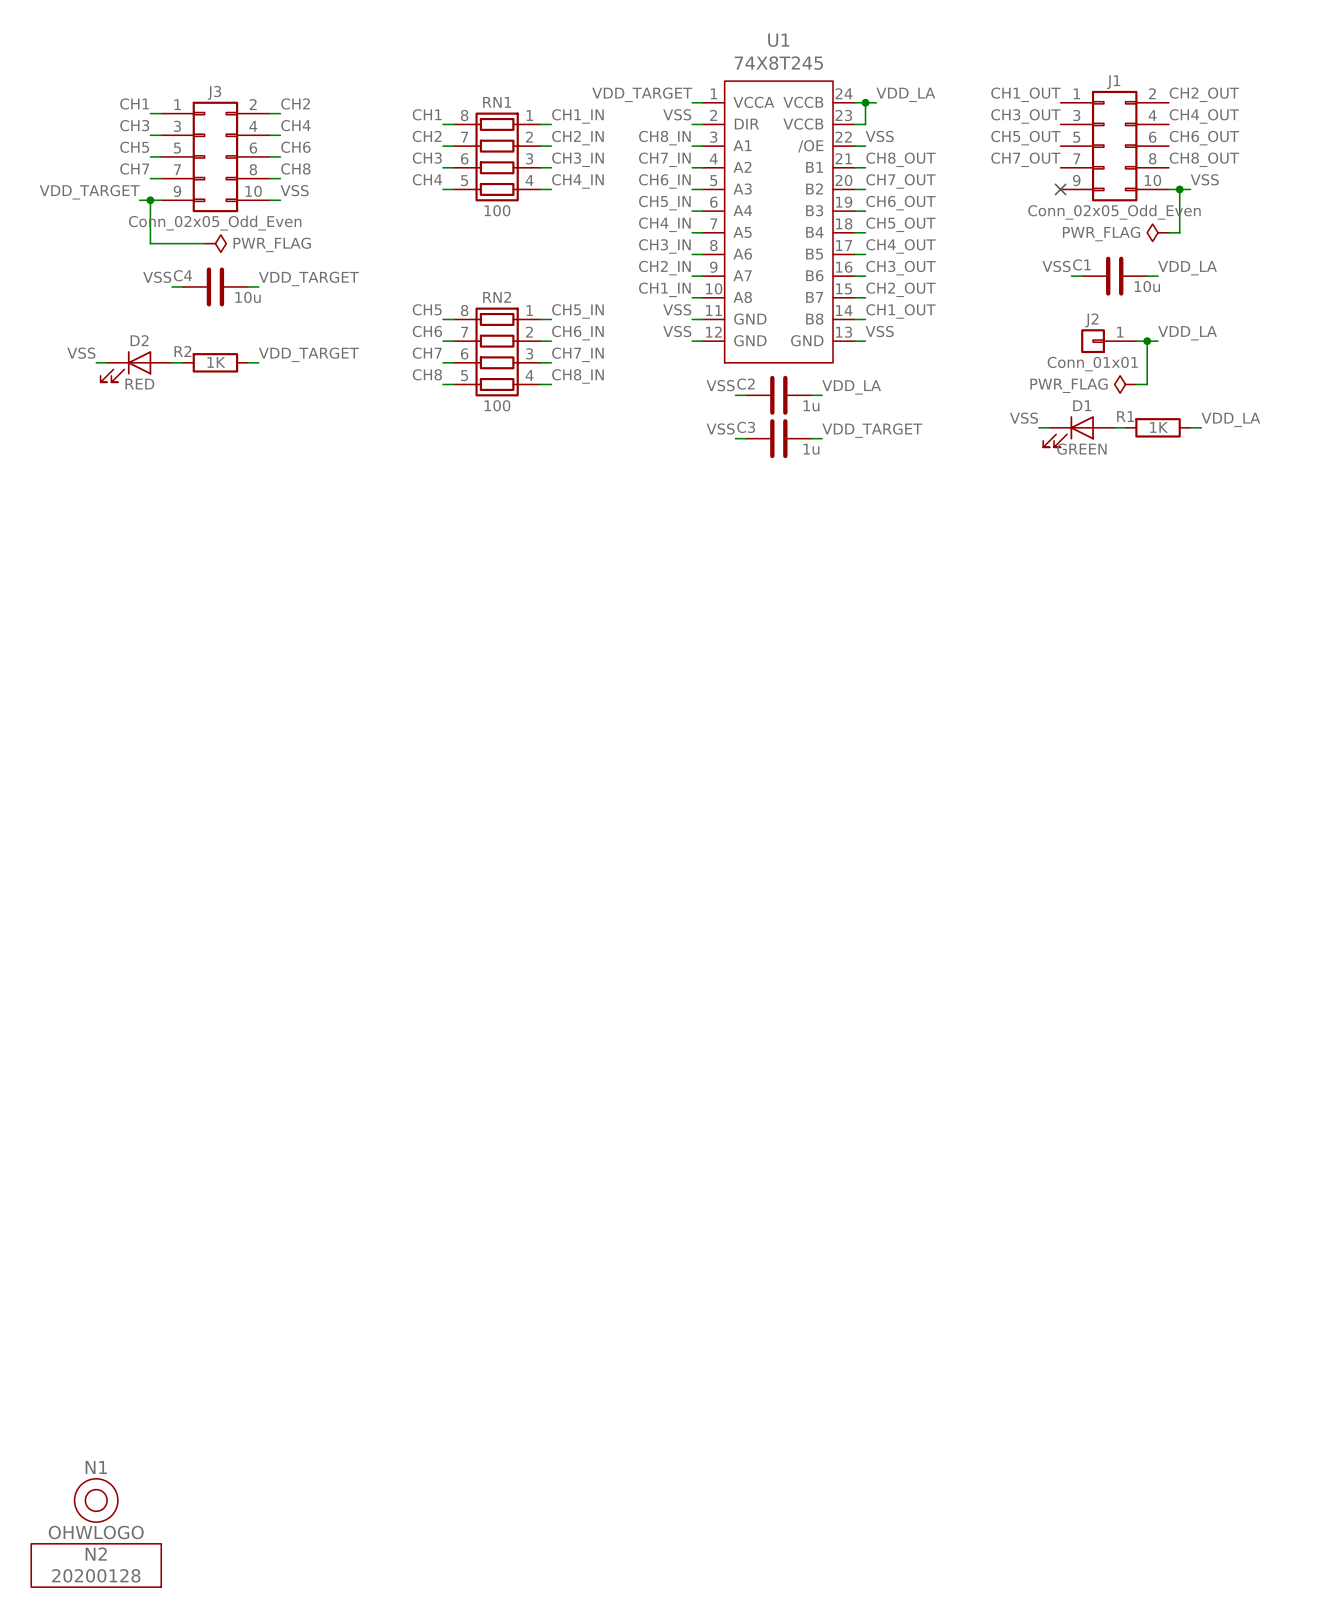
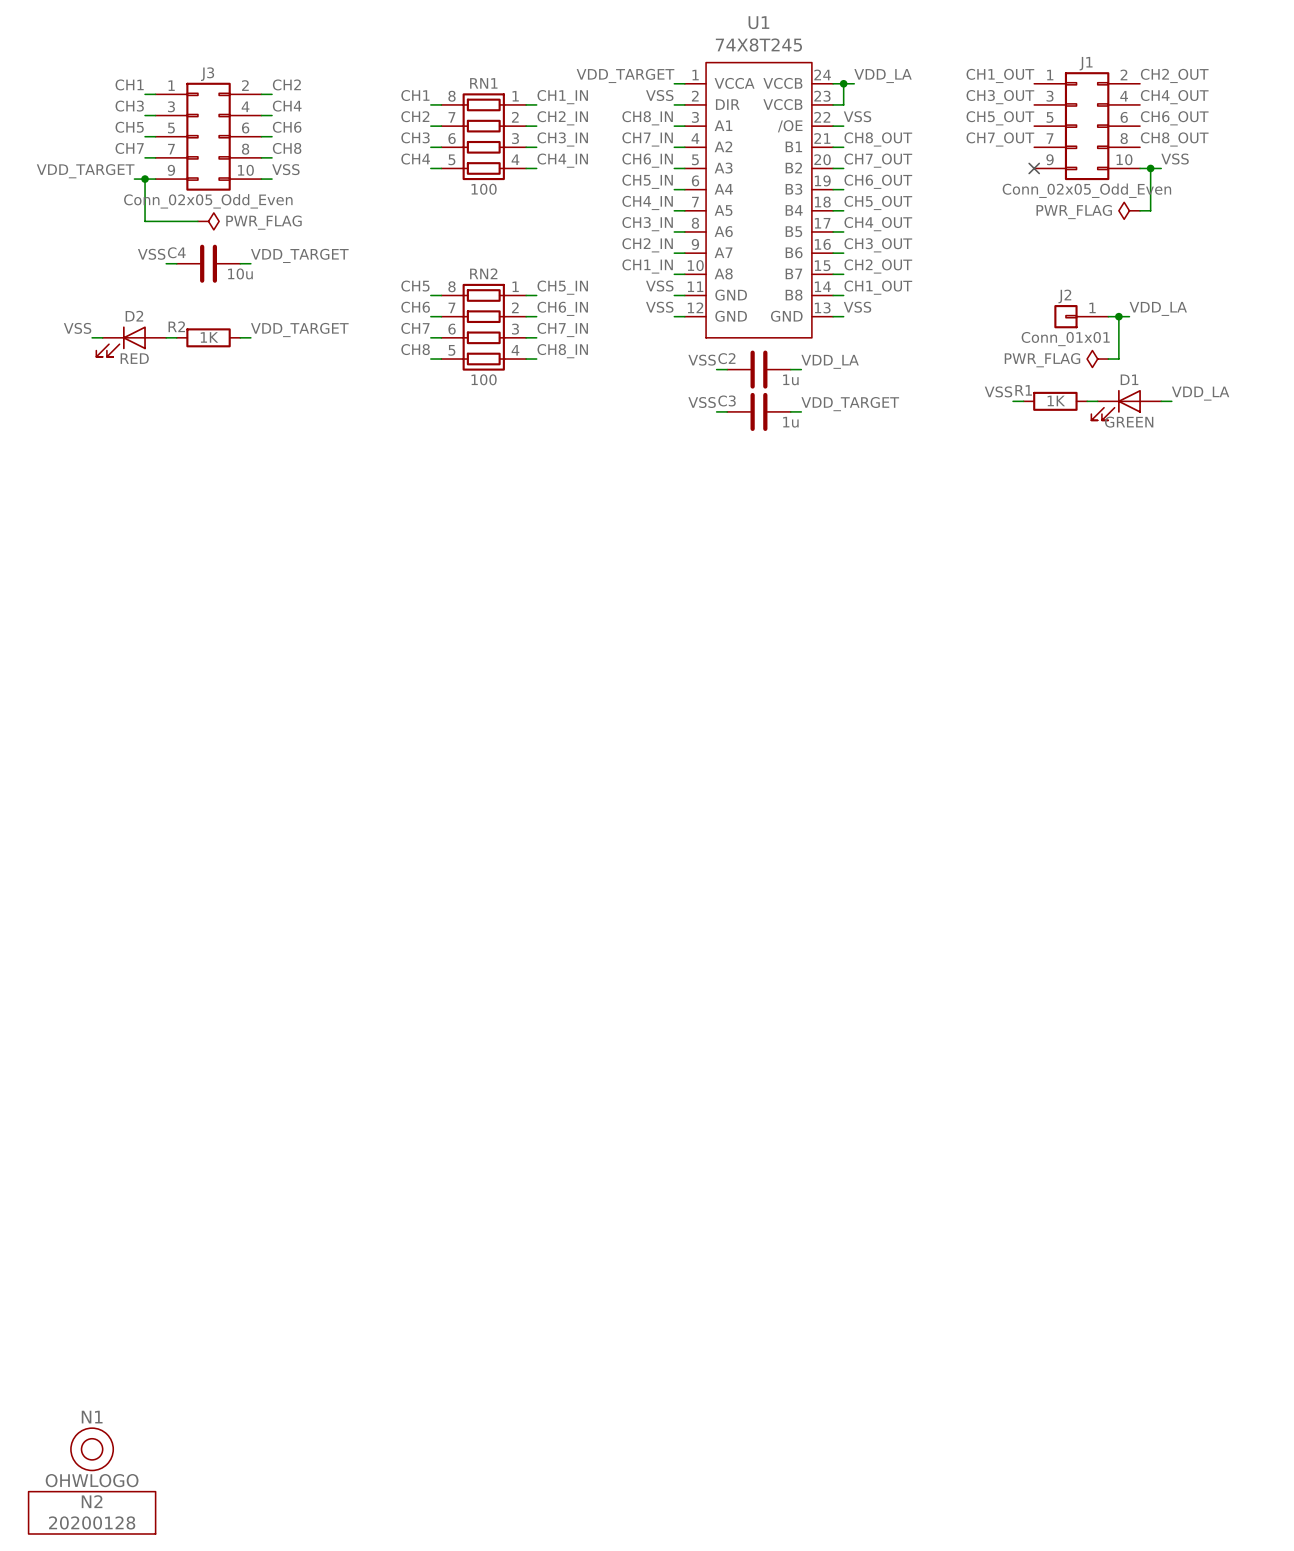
label: VSS (1056, 266) -> none
label: VDD_LA (1187, 268) -> none
wire: (1071, 276) (1082, 276) -> none
C1: 10u (1114, 276) -> none
wire: (1147, 276) (1158, 276) -> none
R1 position: (1158, 427) -> (1055, 401)
D1 position: (1078, 431) -> (1126, 405)

